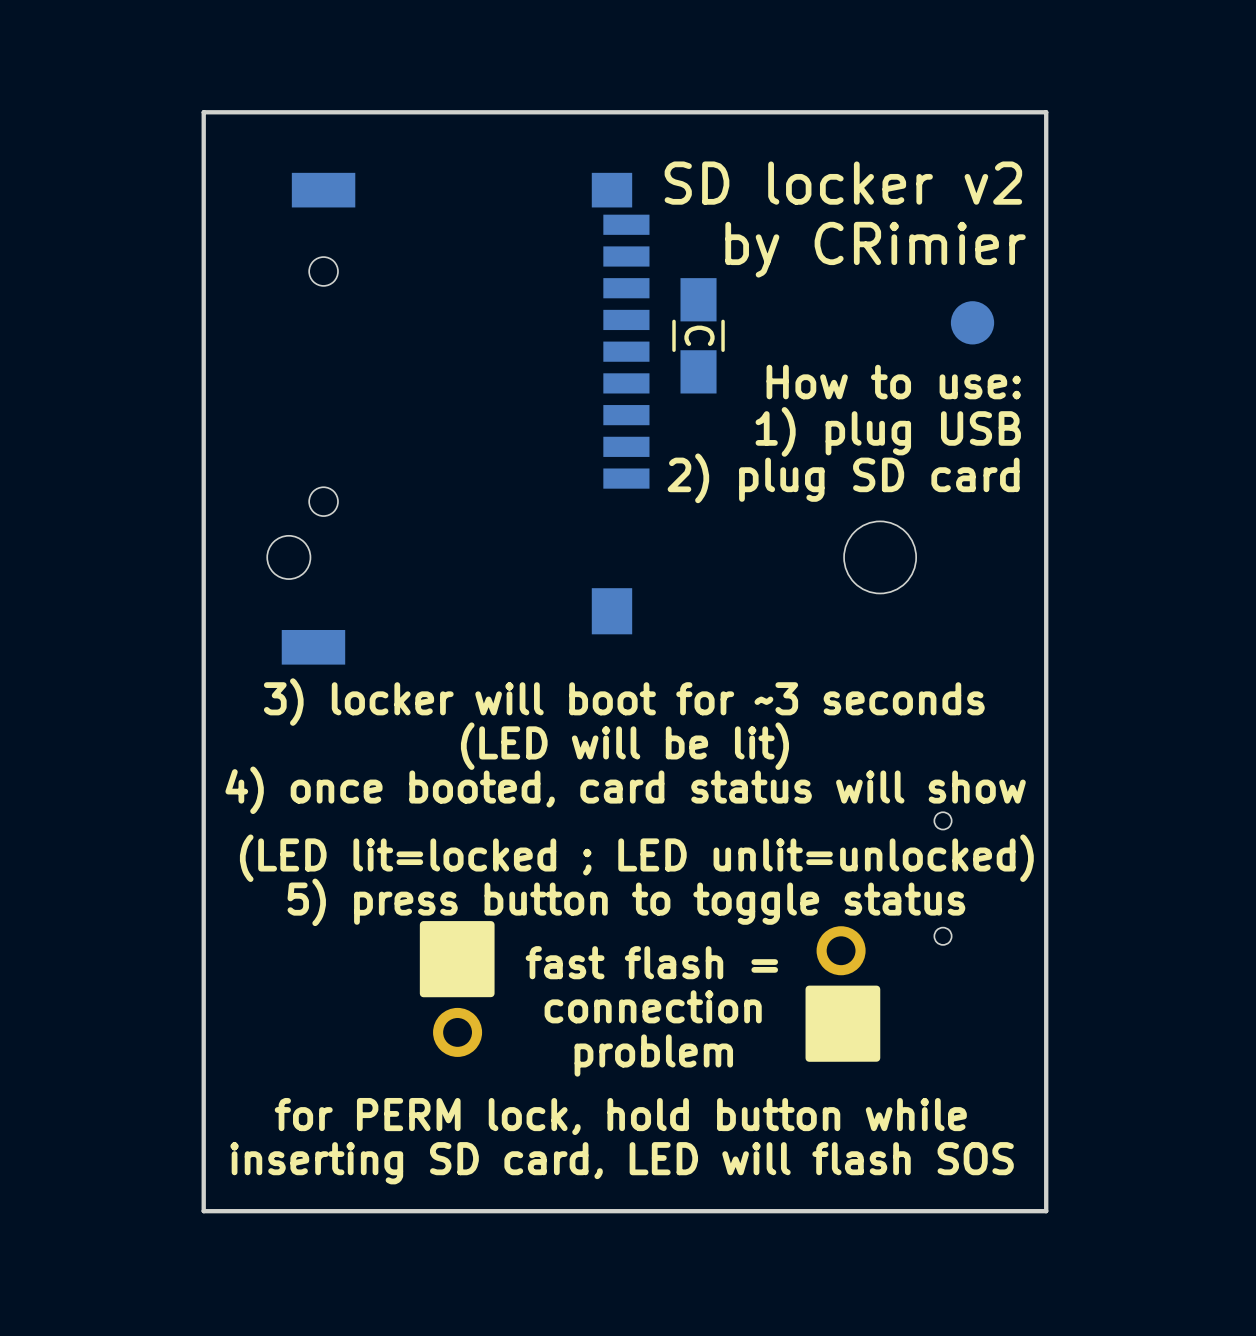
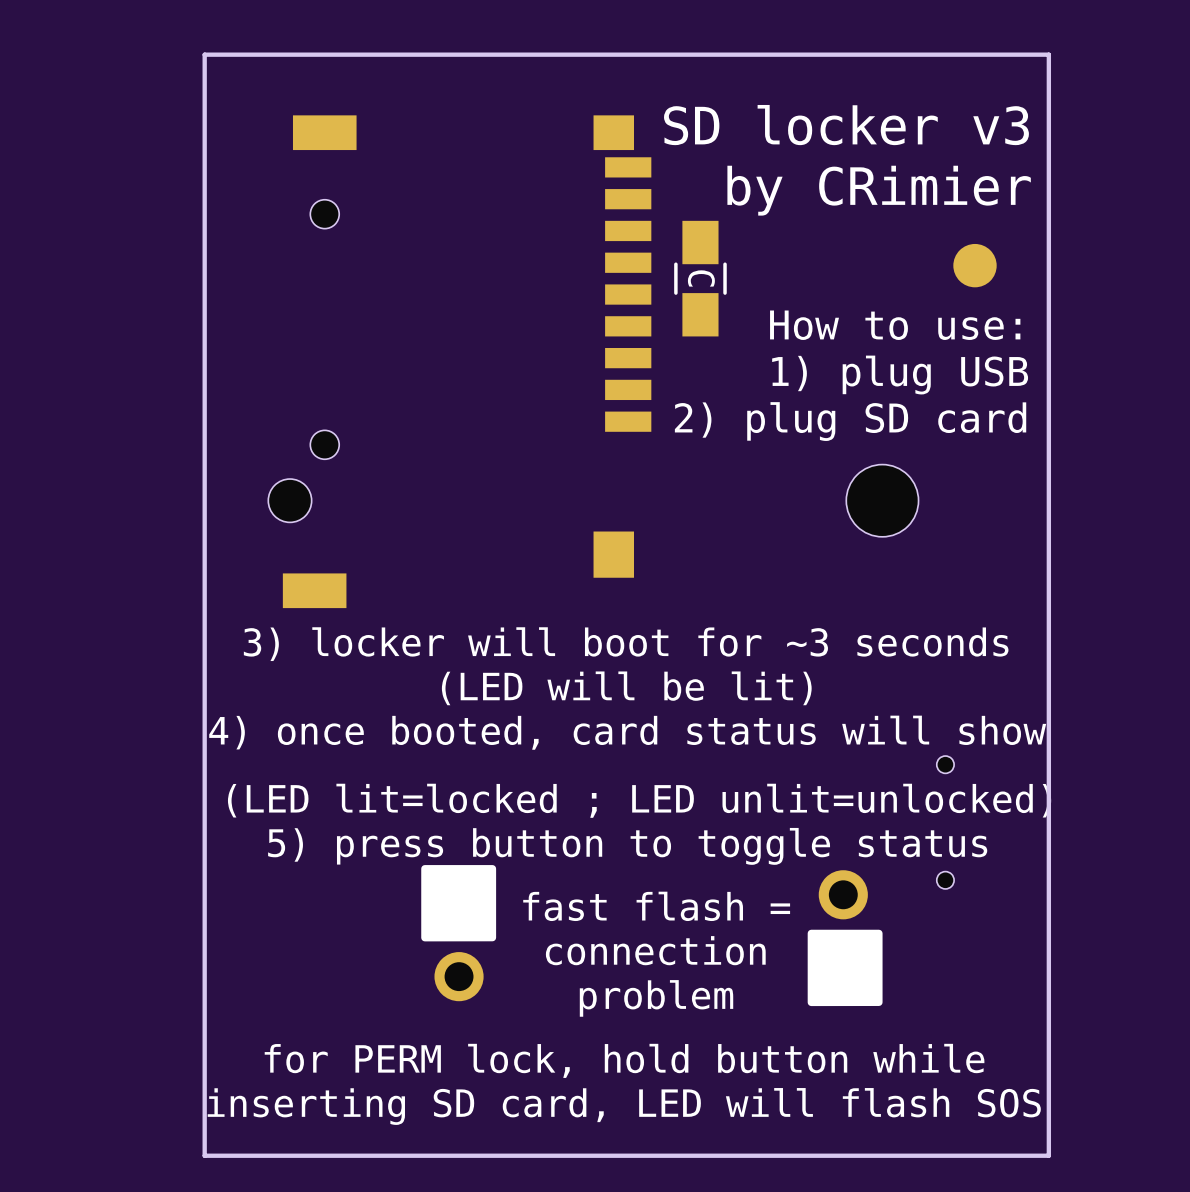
text: SD locker v2 (843, 183) -> SD locker v3 (846, 125)

